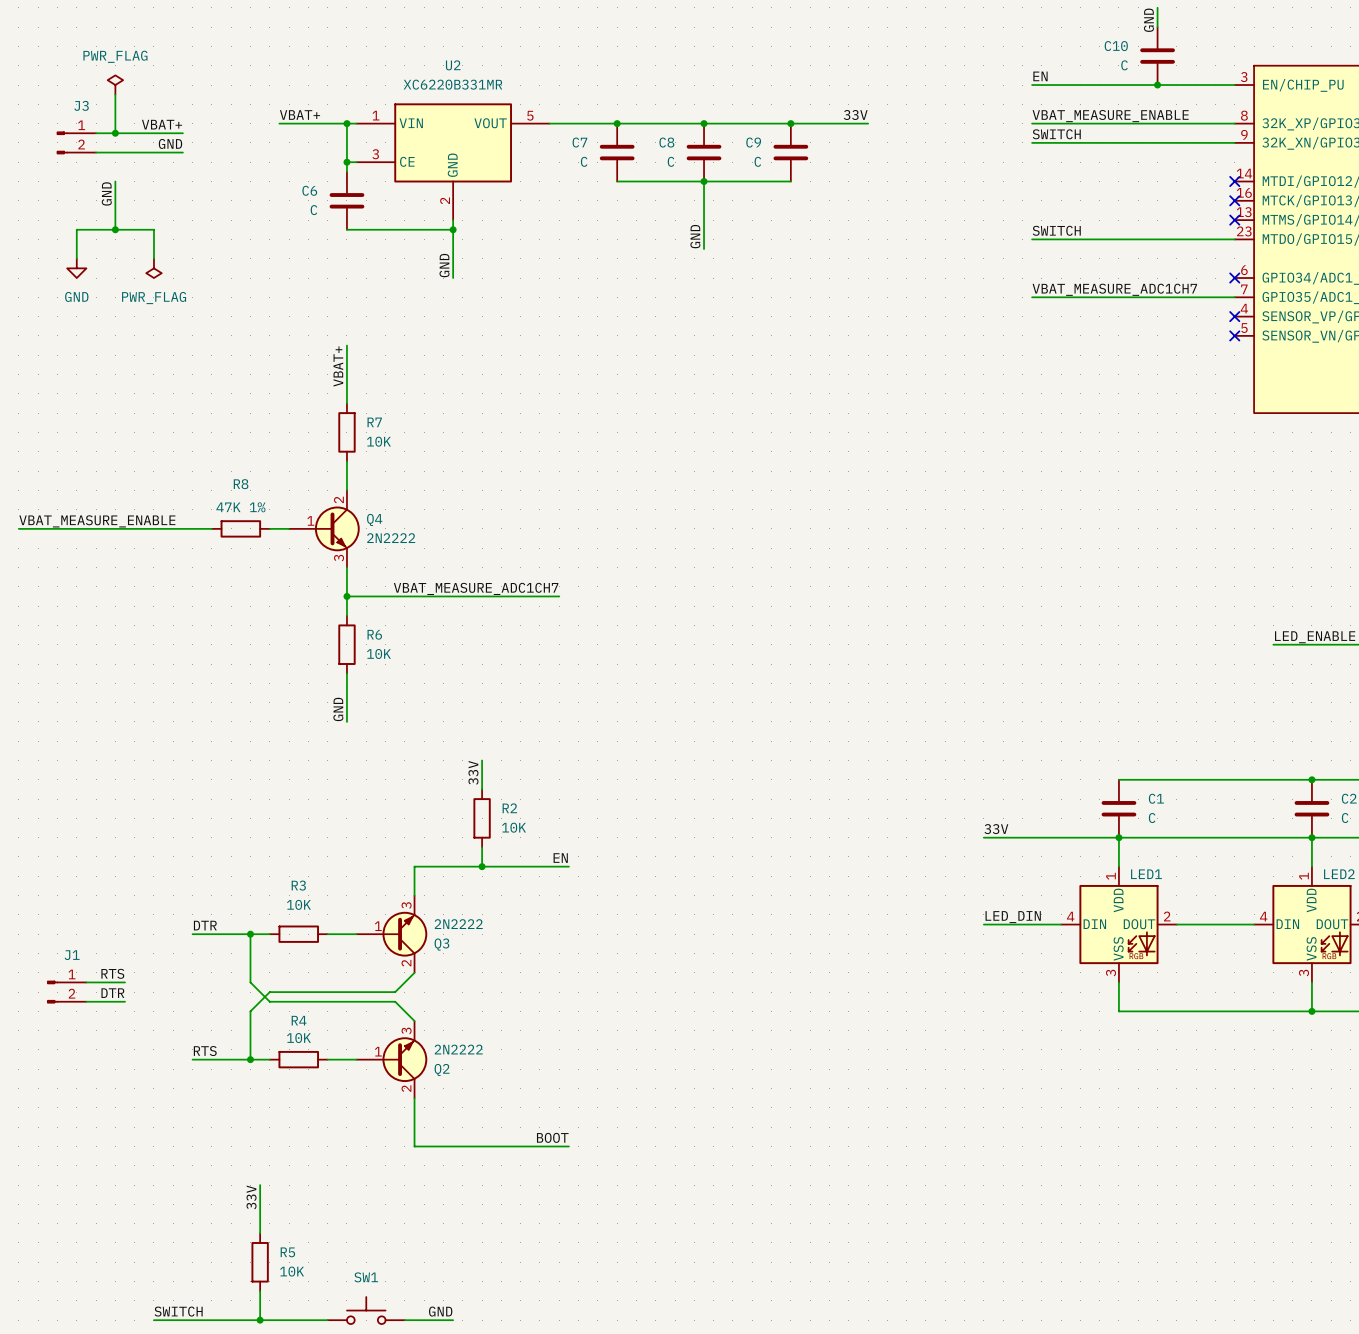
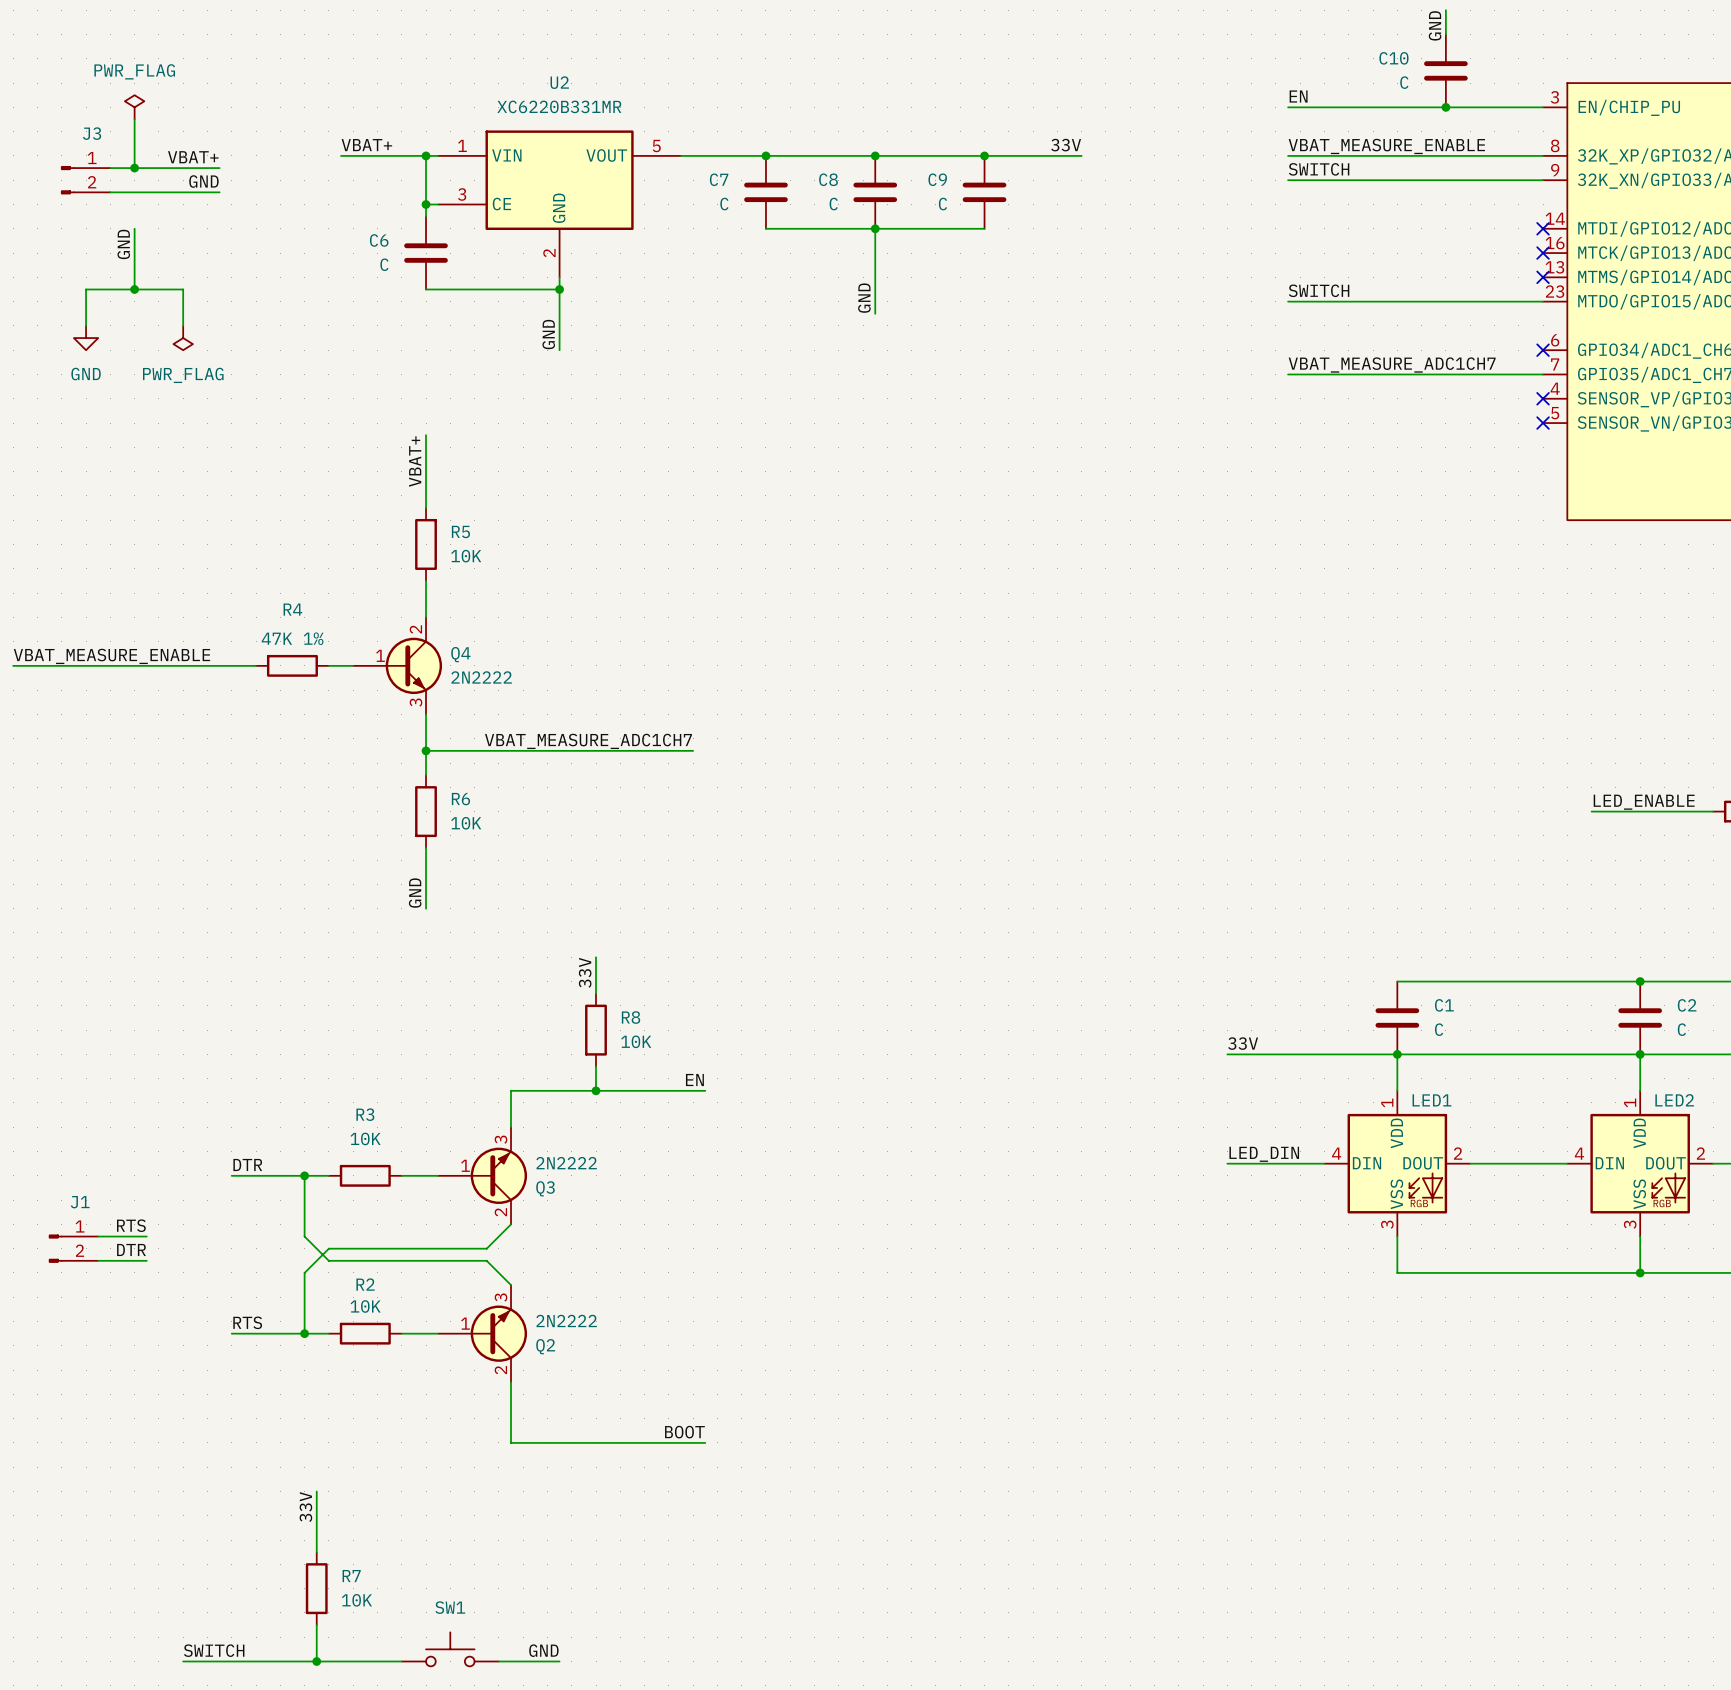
R7 name: R7 (374, 422) -> R5 (460, 531)
R8 name: R8 (241, 484) -> R4 (292, 609)
R2 name: R2 (509, 808) -> R8 (631, 1017)
R4 name: R4 (299, 1020) -> R2 (365, 1284)
R5 name: R5 (287, 1252) -> R7 (351, 1576)

